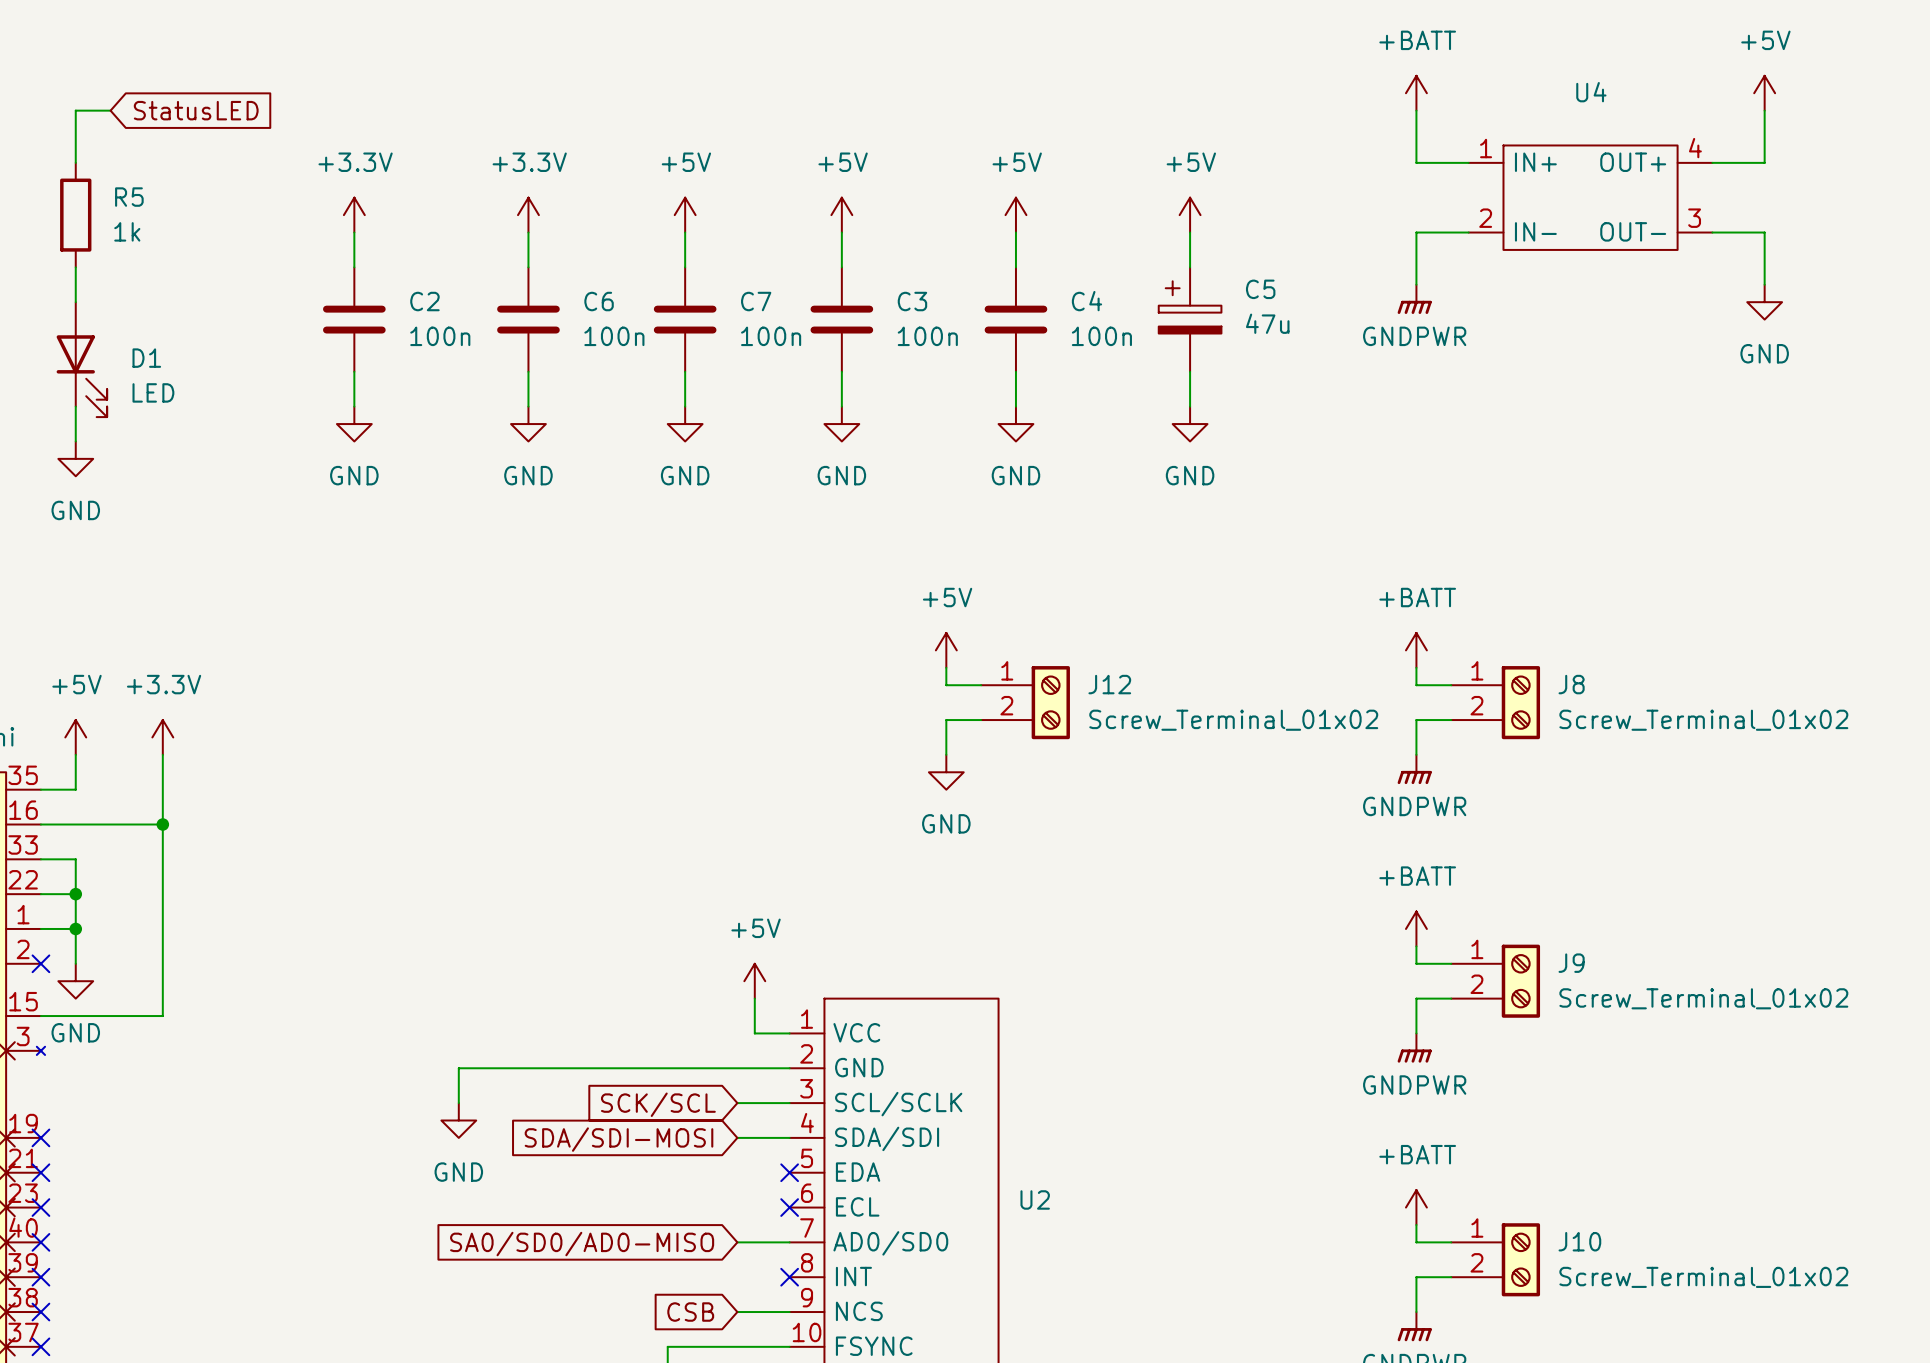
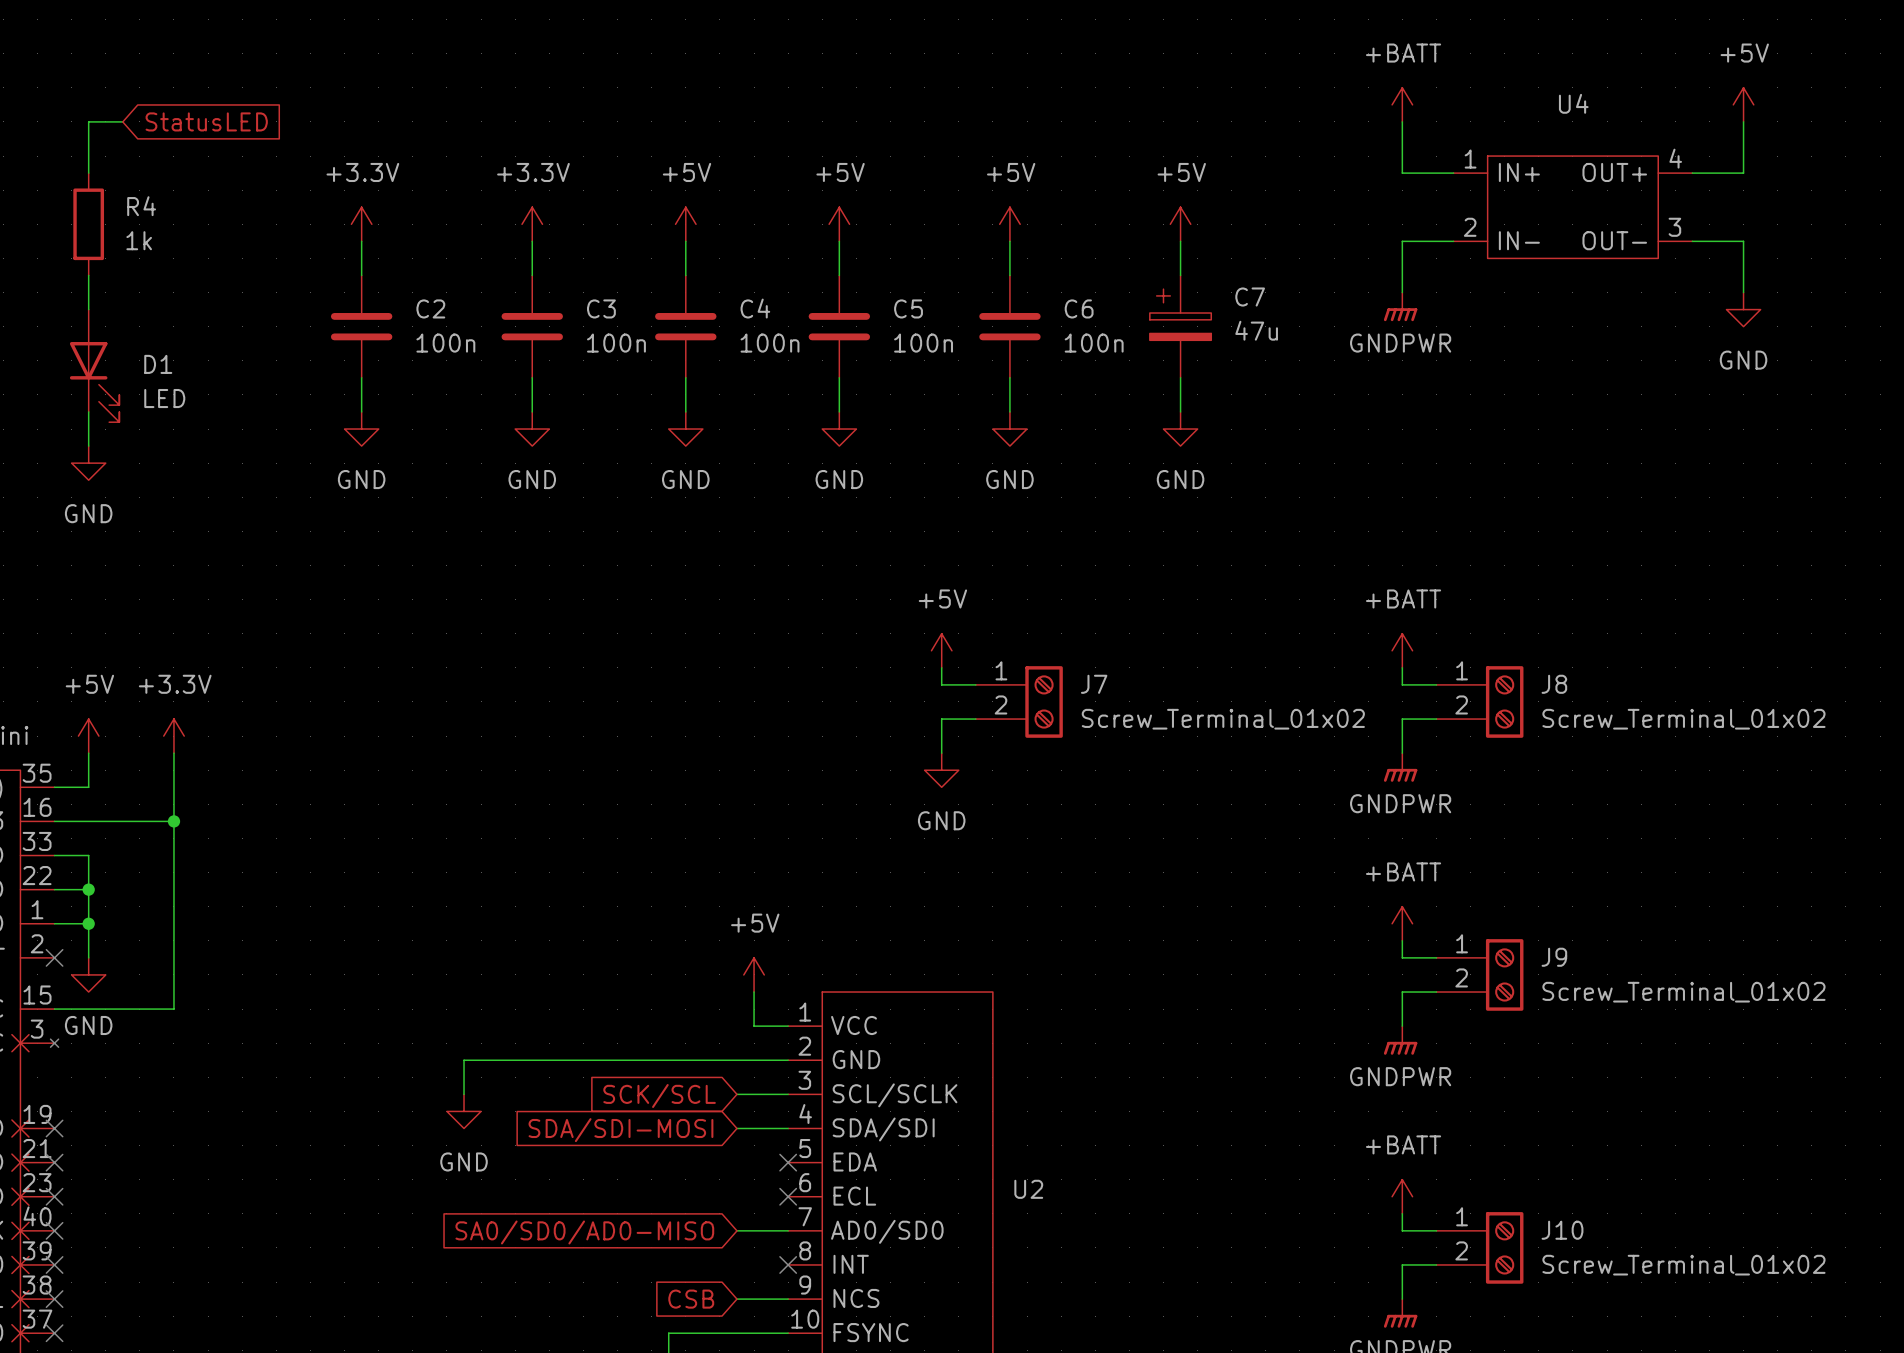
R5 name: R5 (129, 197) -> R4 (141, 206)
C5 name: C5 (1260, 289) -> C7 (1250, 297)
C6 name: C6 (599, 301) -> C3 (601, 308)
C7 name: C7 (756, 301) -> C4 (755, 308)
C3 name: C3 (912, 301) -> C5 (908, 308)
C4 name: C4 (1086, 301) -> C6 (1079, 308)
J12 name: J12 (1109, 684) -> J7 (1094, 684)

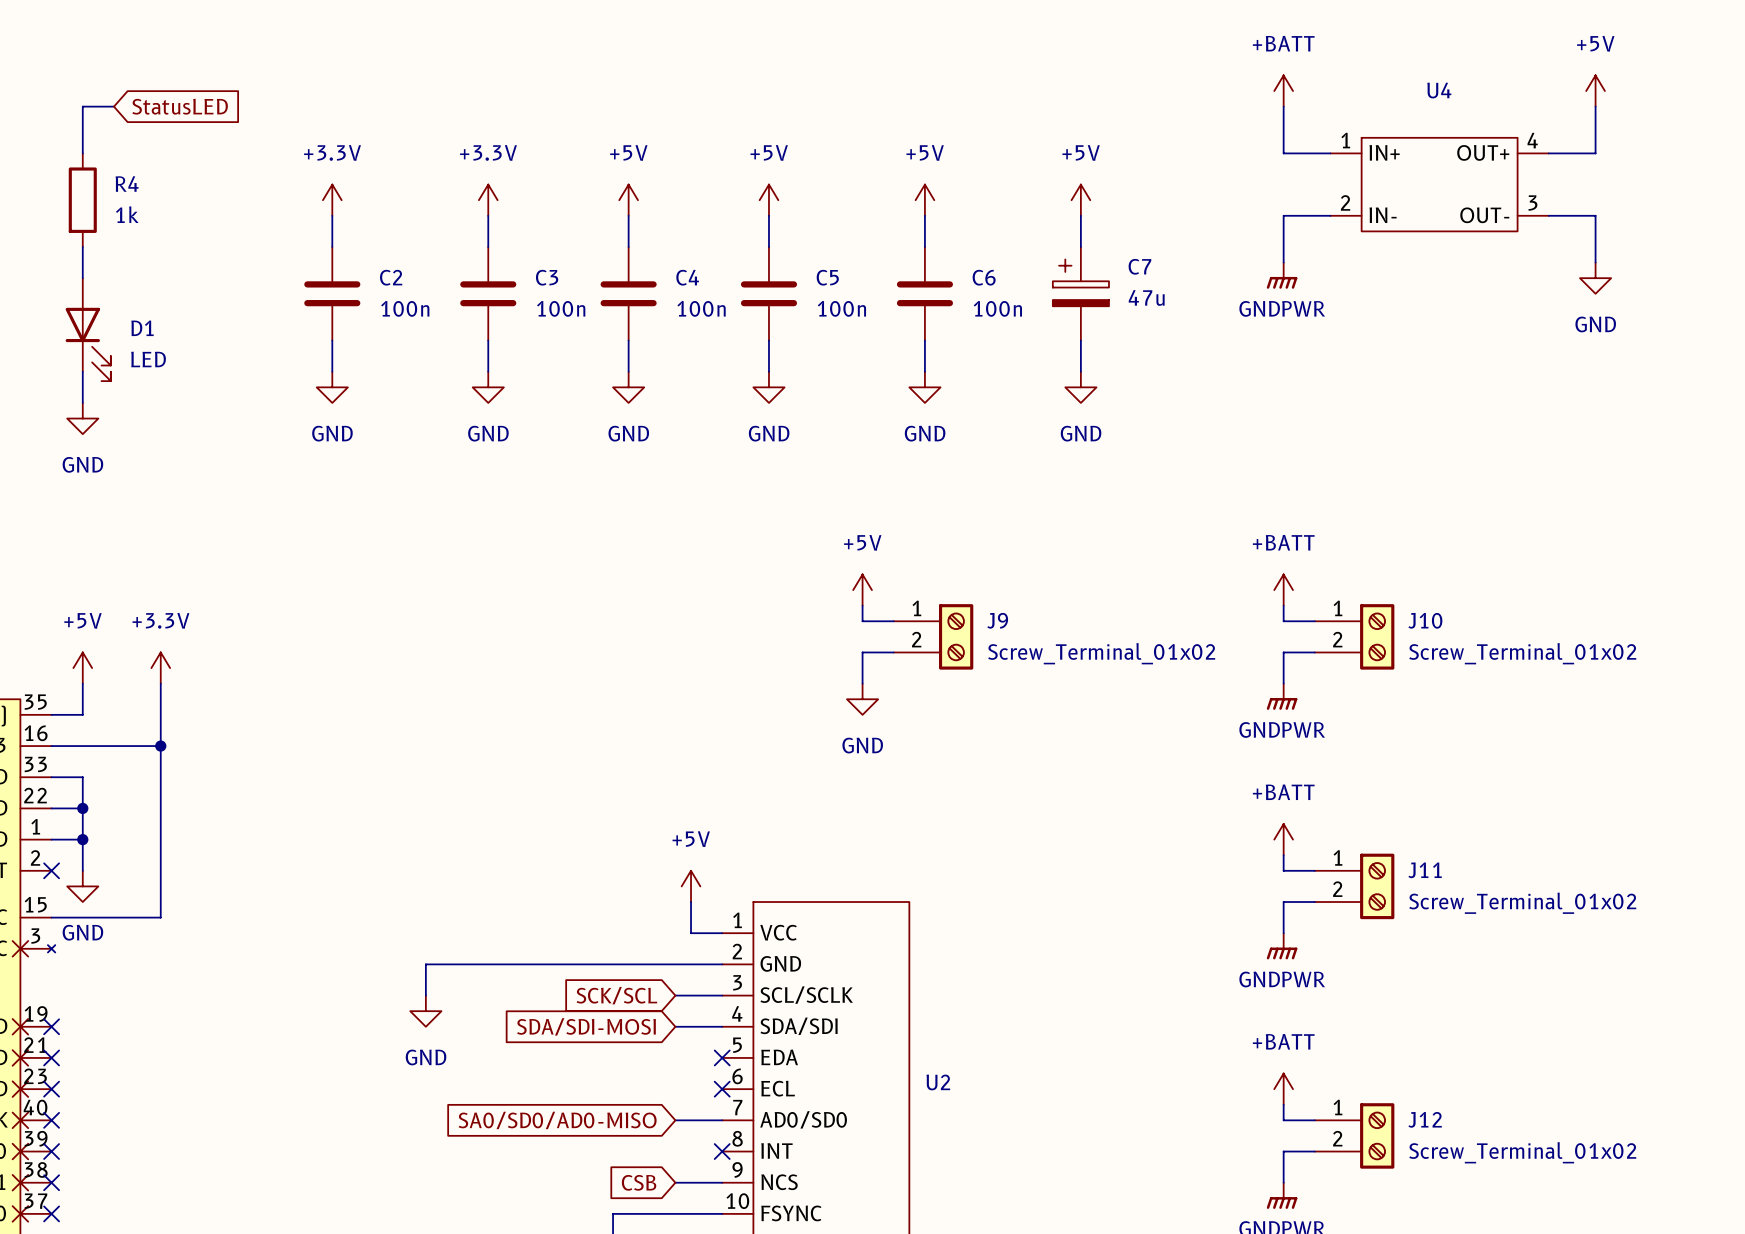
J7 name: J7 (1094, 684) -> J9 (997, 620)
J8 name: J8 (1554, 684) -> J10 (1425, 620)
J9 name: J9 (1554, 957) -> J11 (1425, 870)
J10 name: J10 (1562, 1230) -> J12 (1425, 1119)

